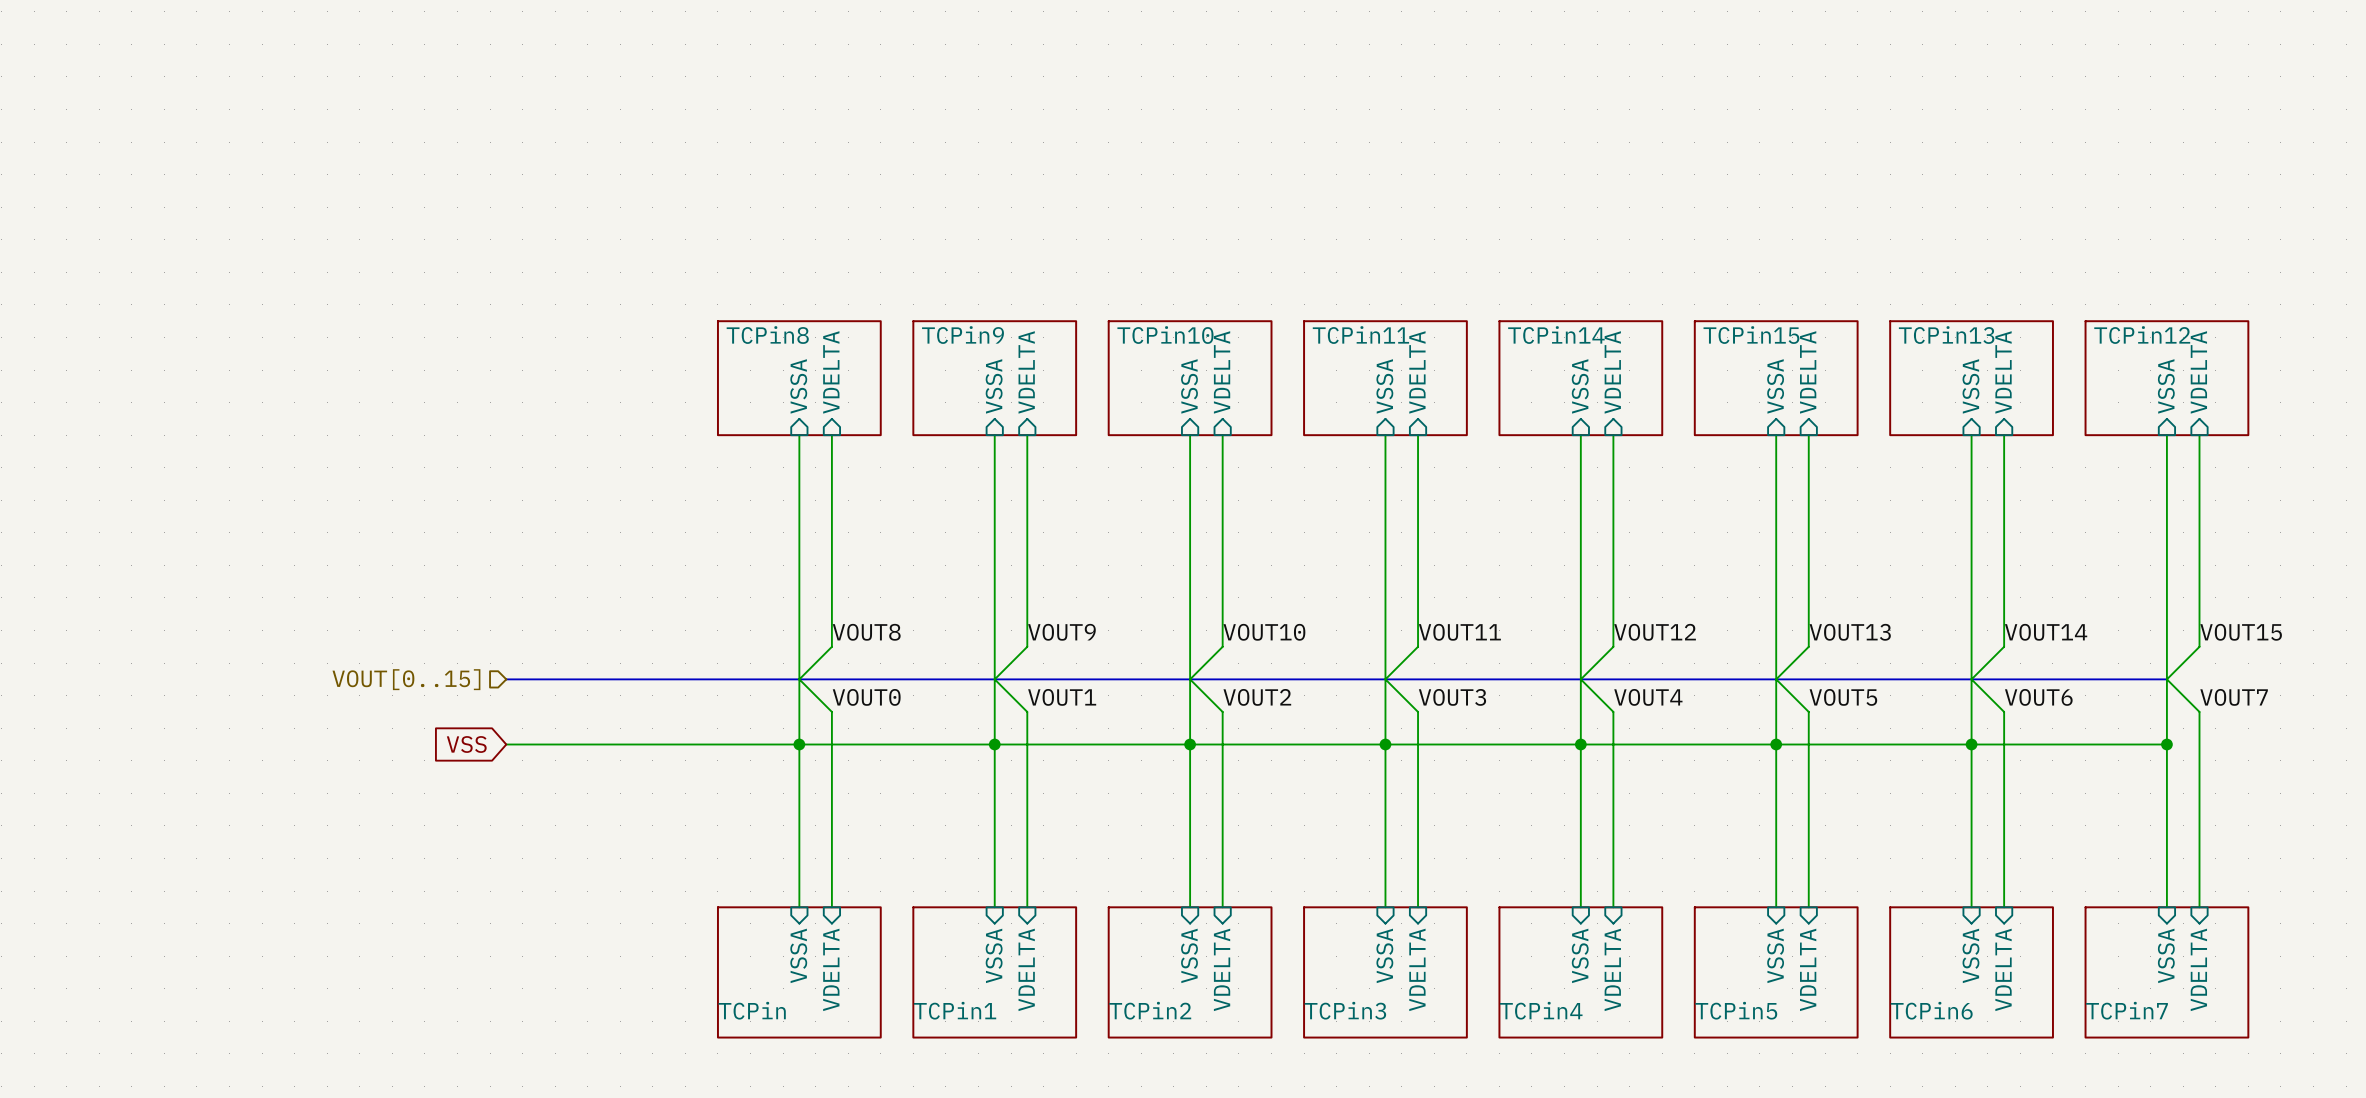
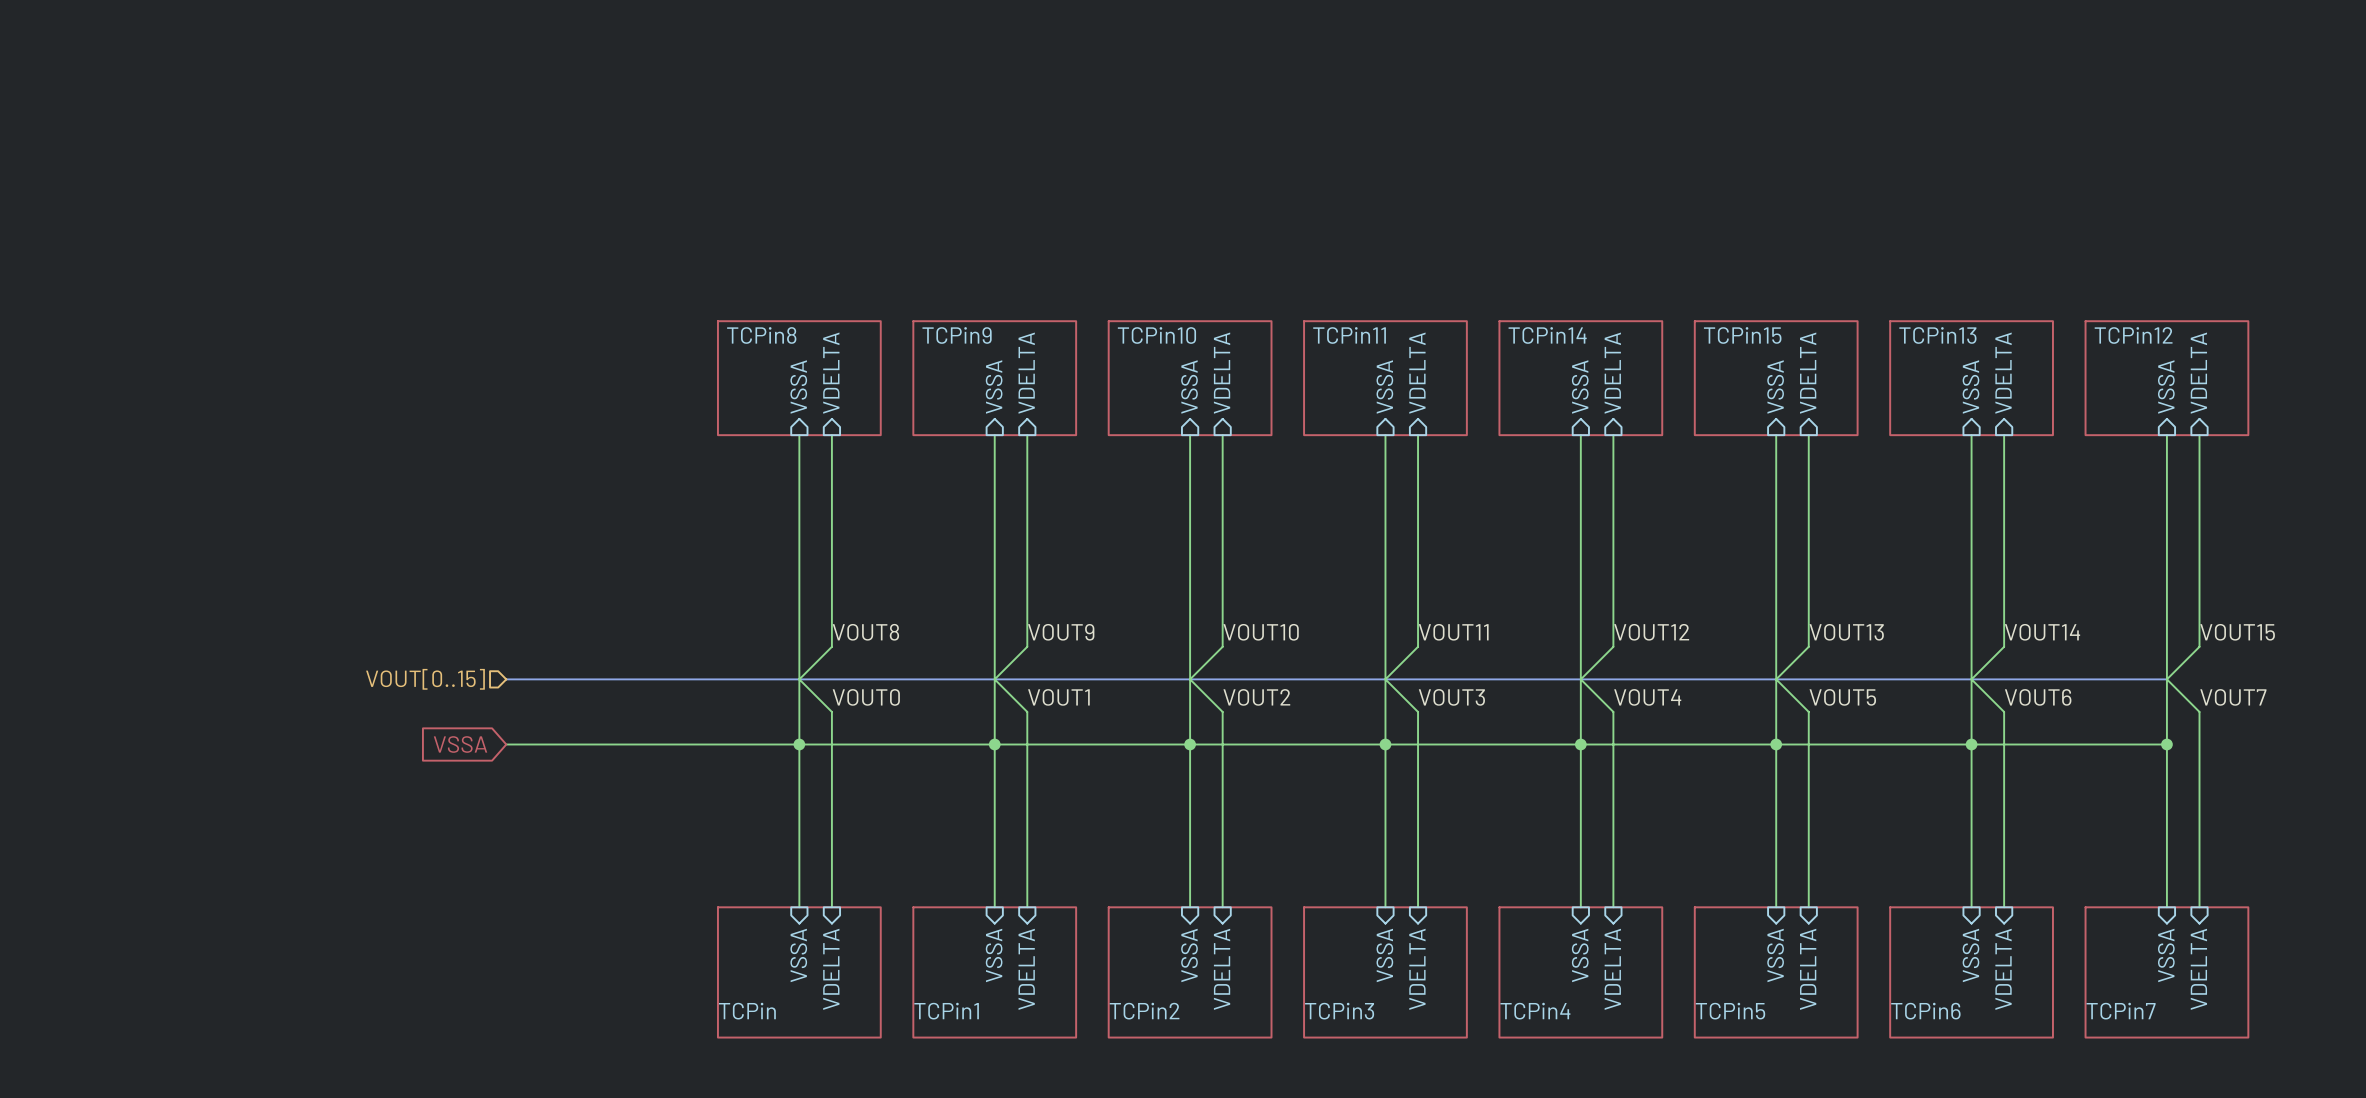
global label: VSS (466, 744) -> VSSA (460, 744)

